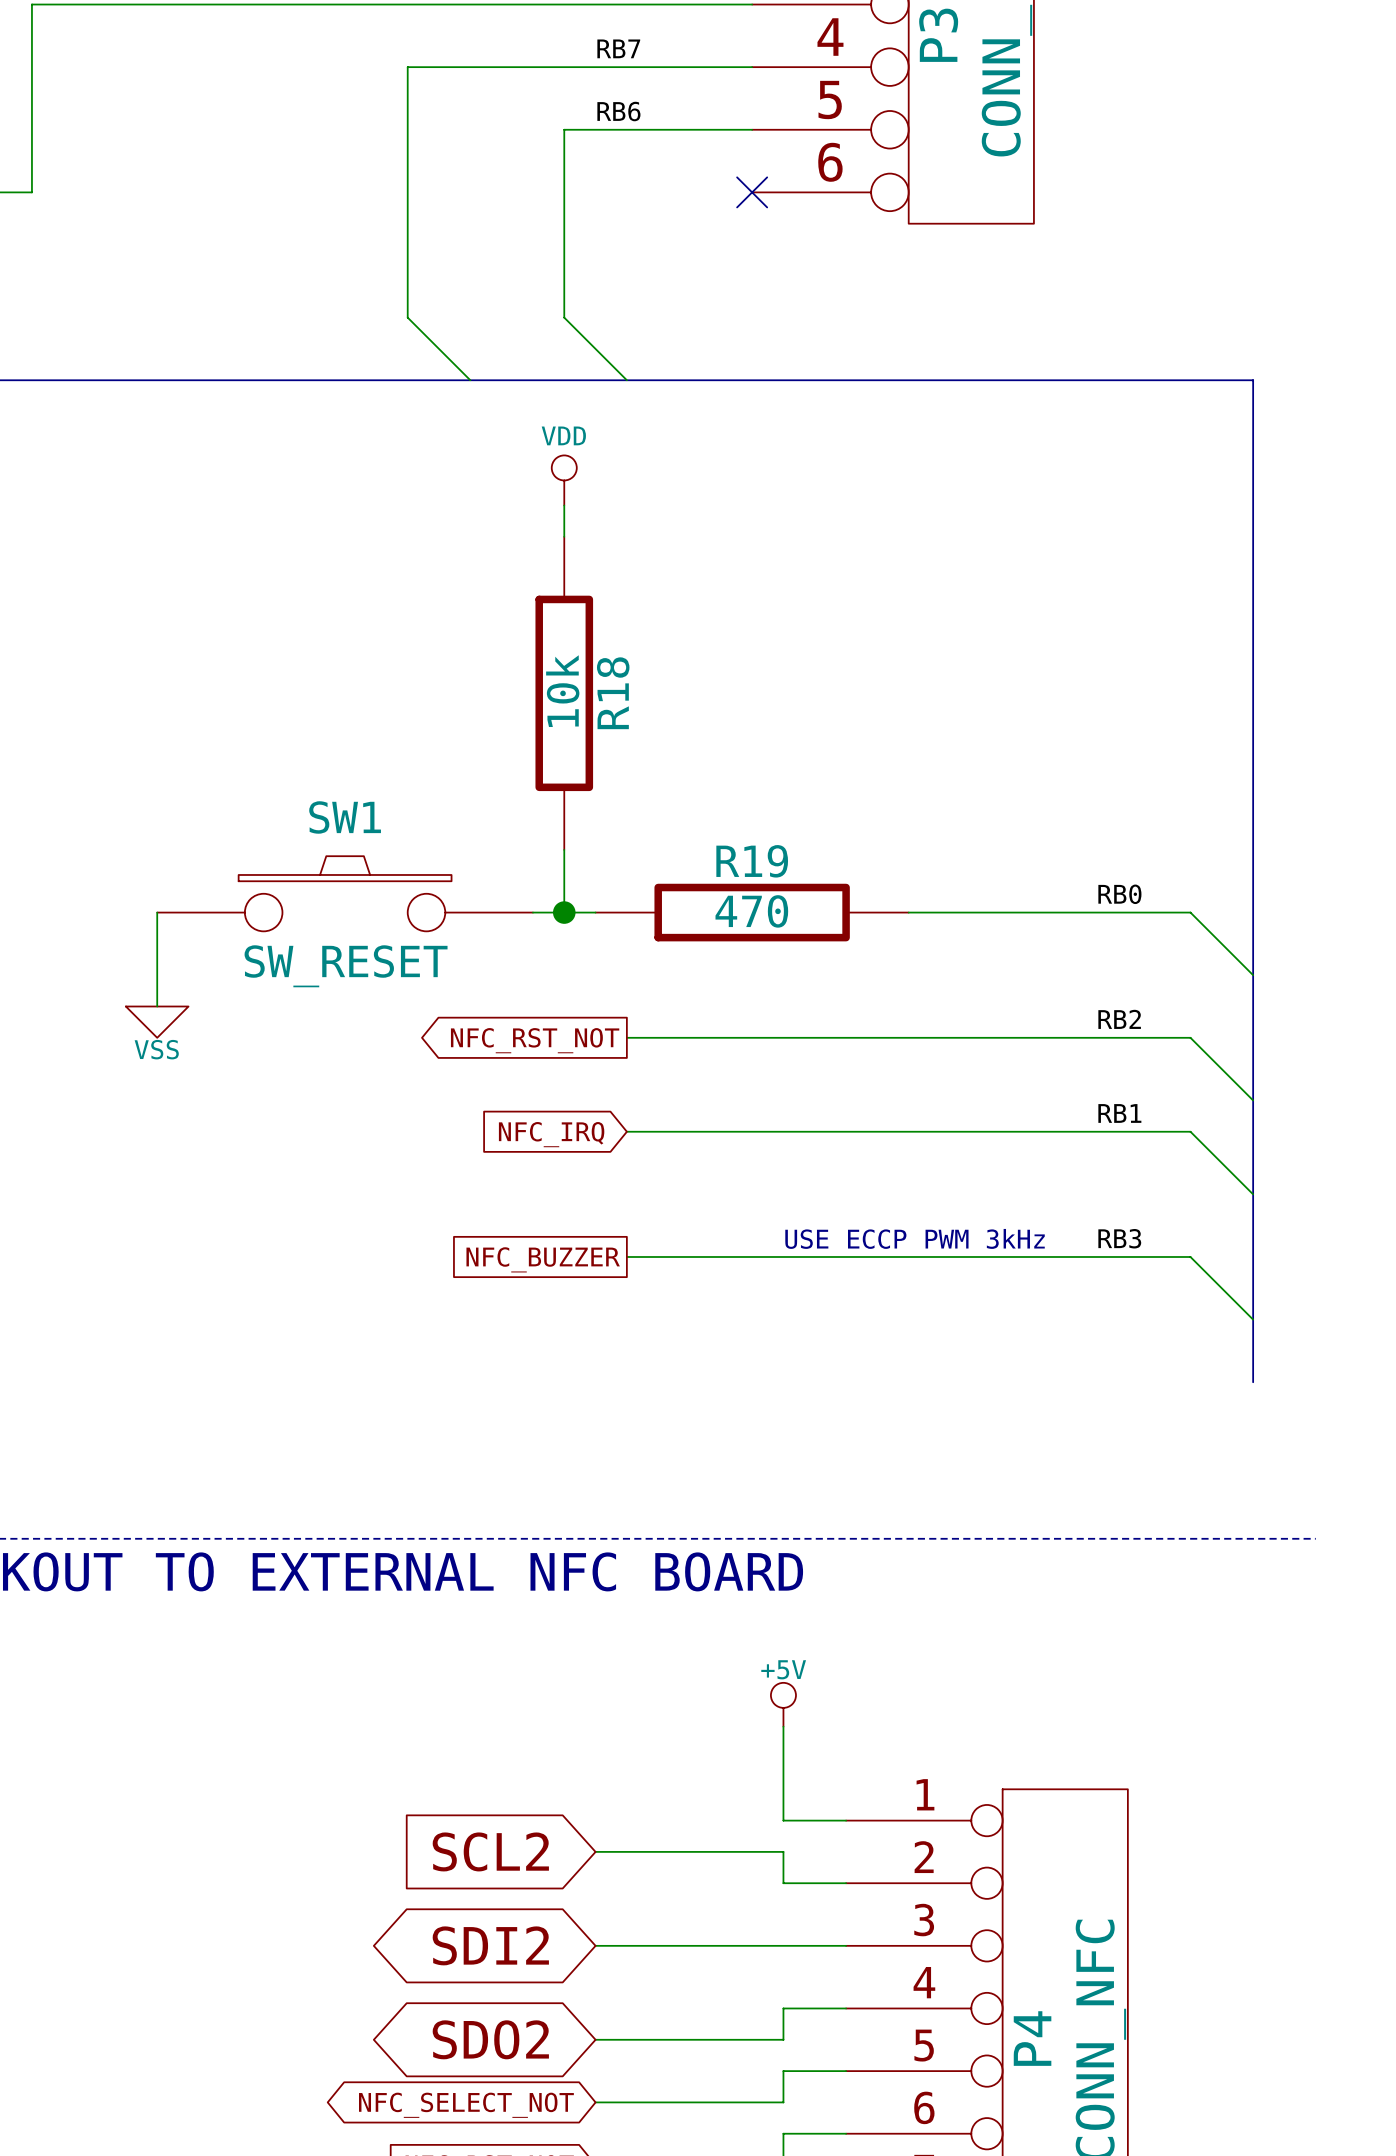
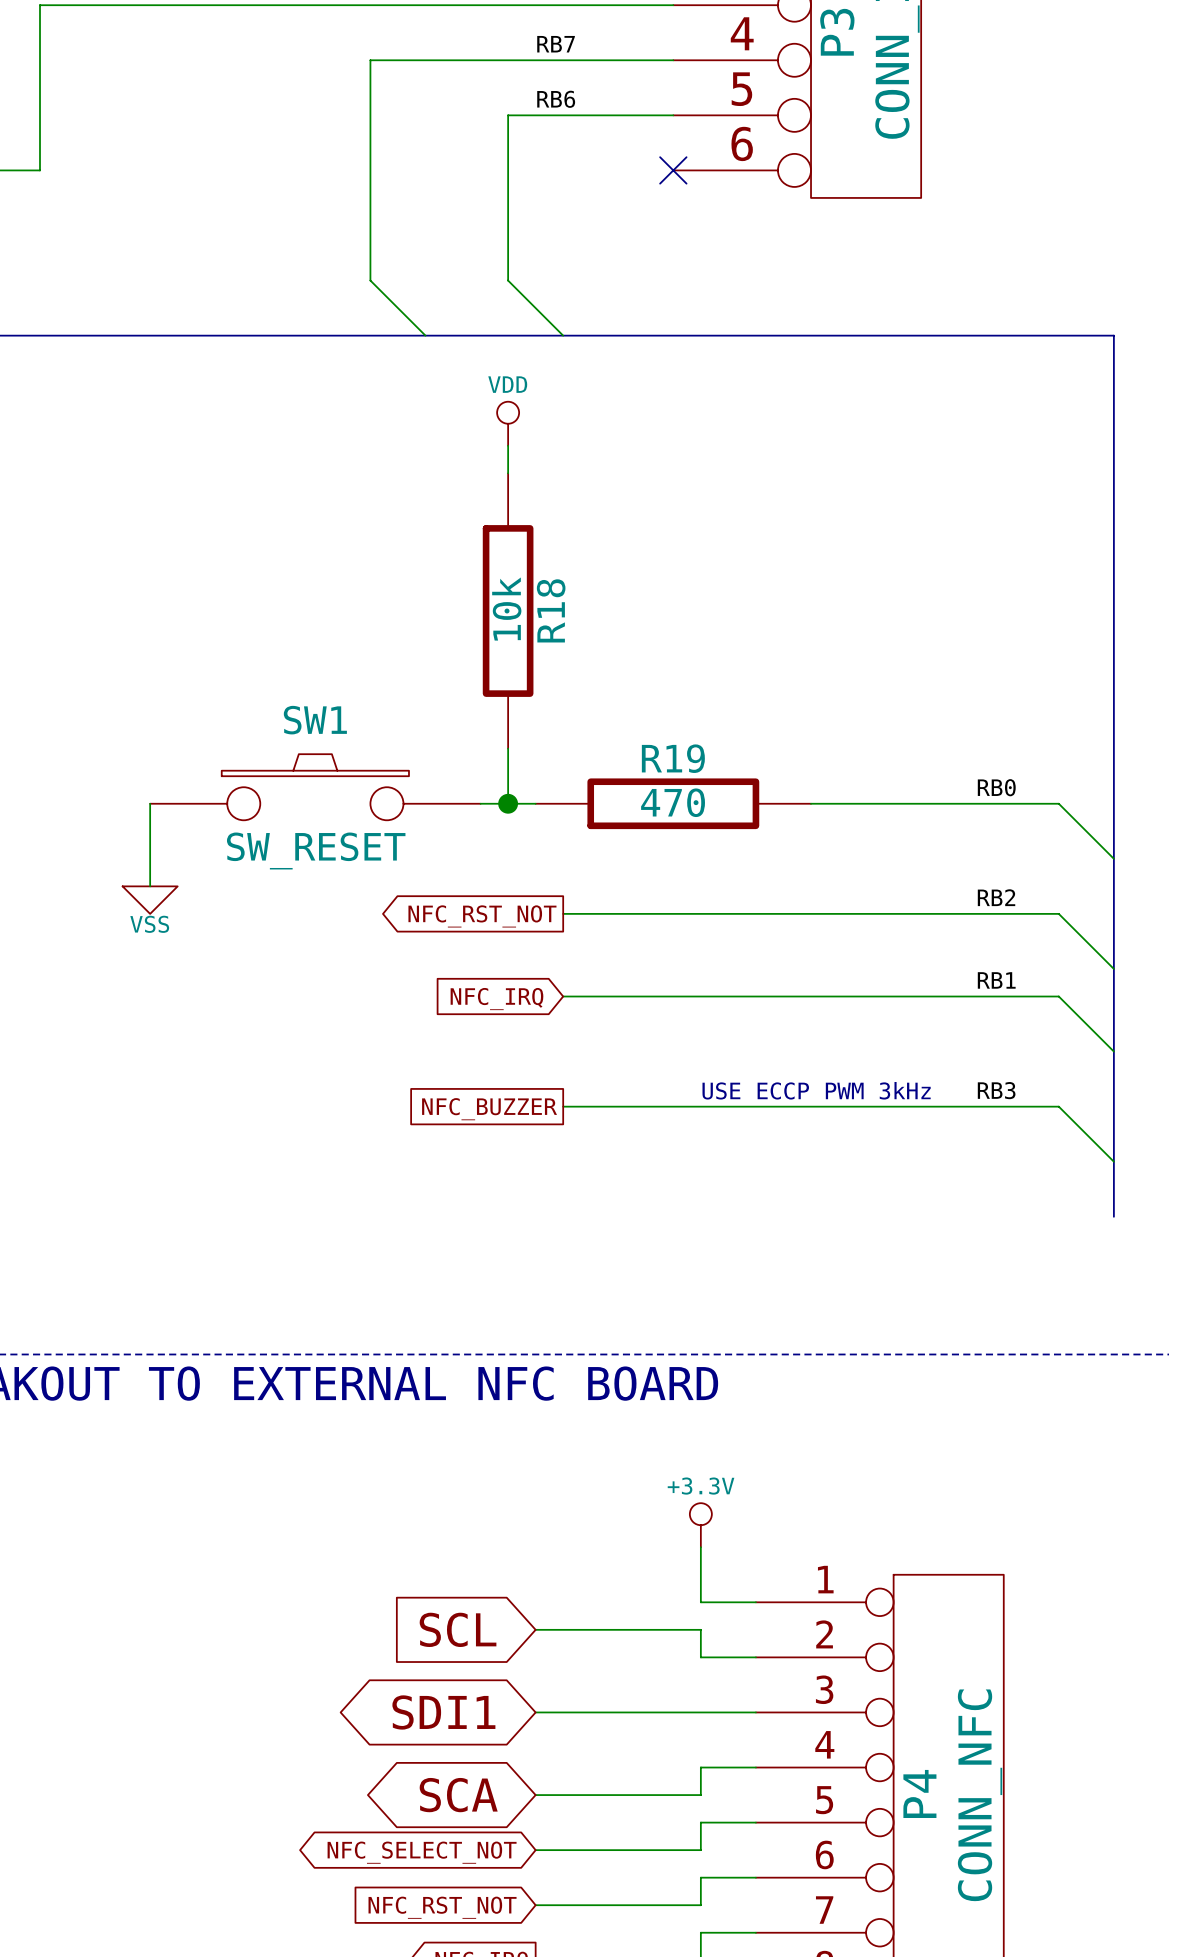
power symbol: +5V (783, 1704) -> none
power symbol: none -> +3.3V (700, 1525)
global label: SCL2 (490, 1851) -> SCL (458, 1629)
global label: SDI2 (490, 1945) -> SDI1 (443, 1712)
global label: SDO2 (490, 2039) -> SCA (458, 1795)

